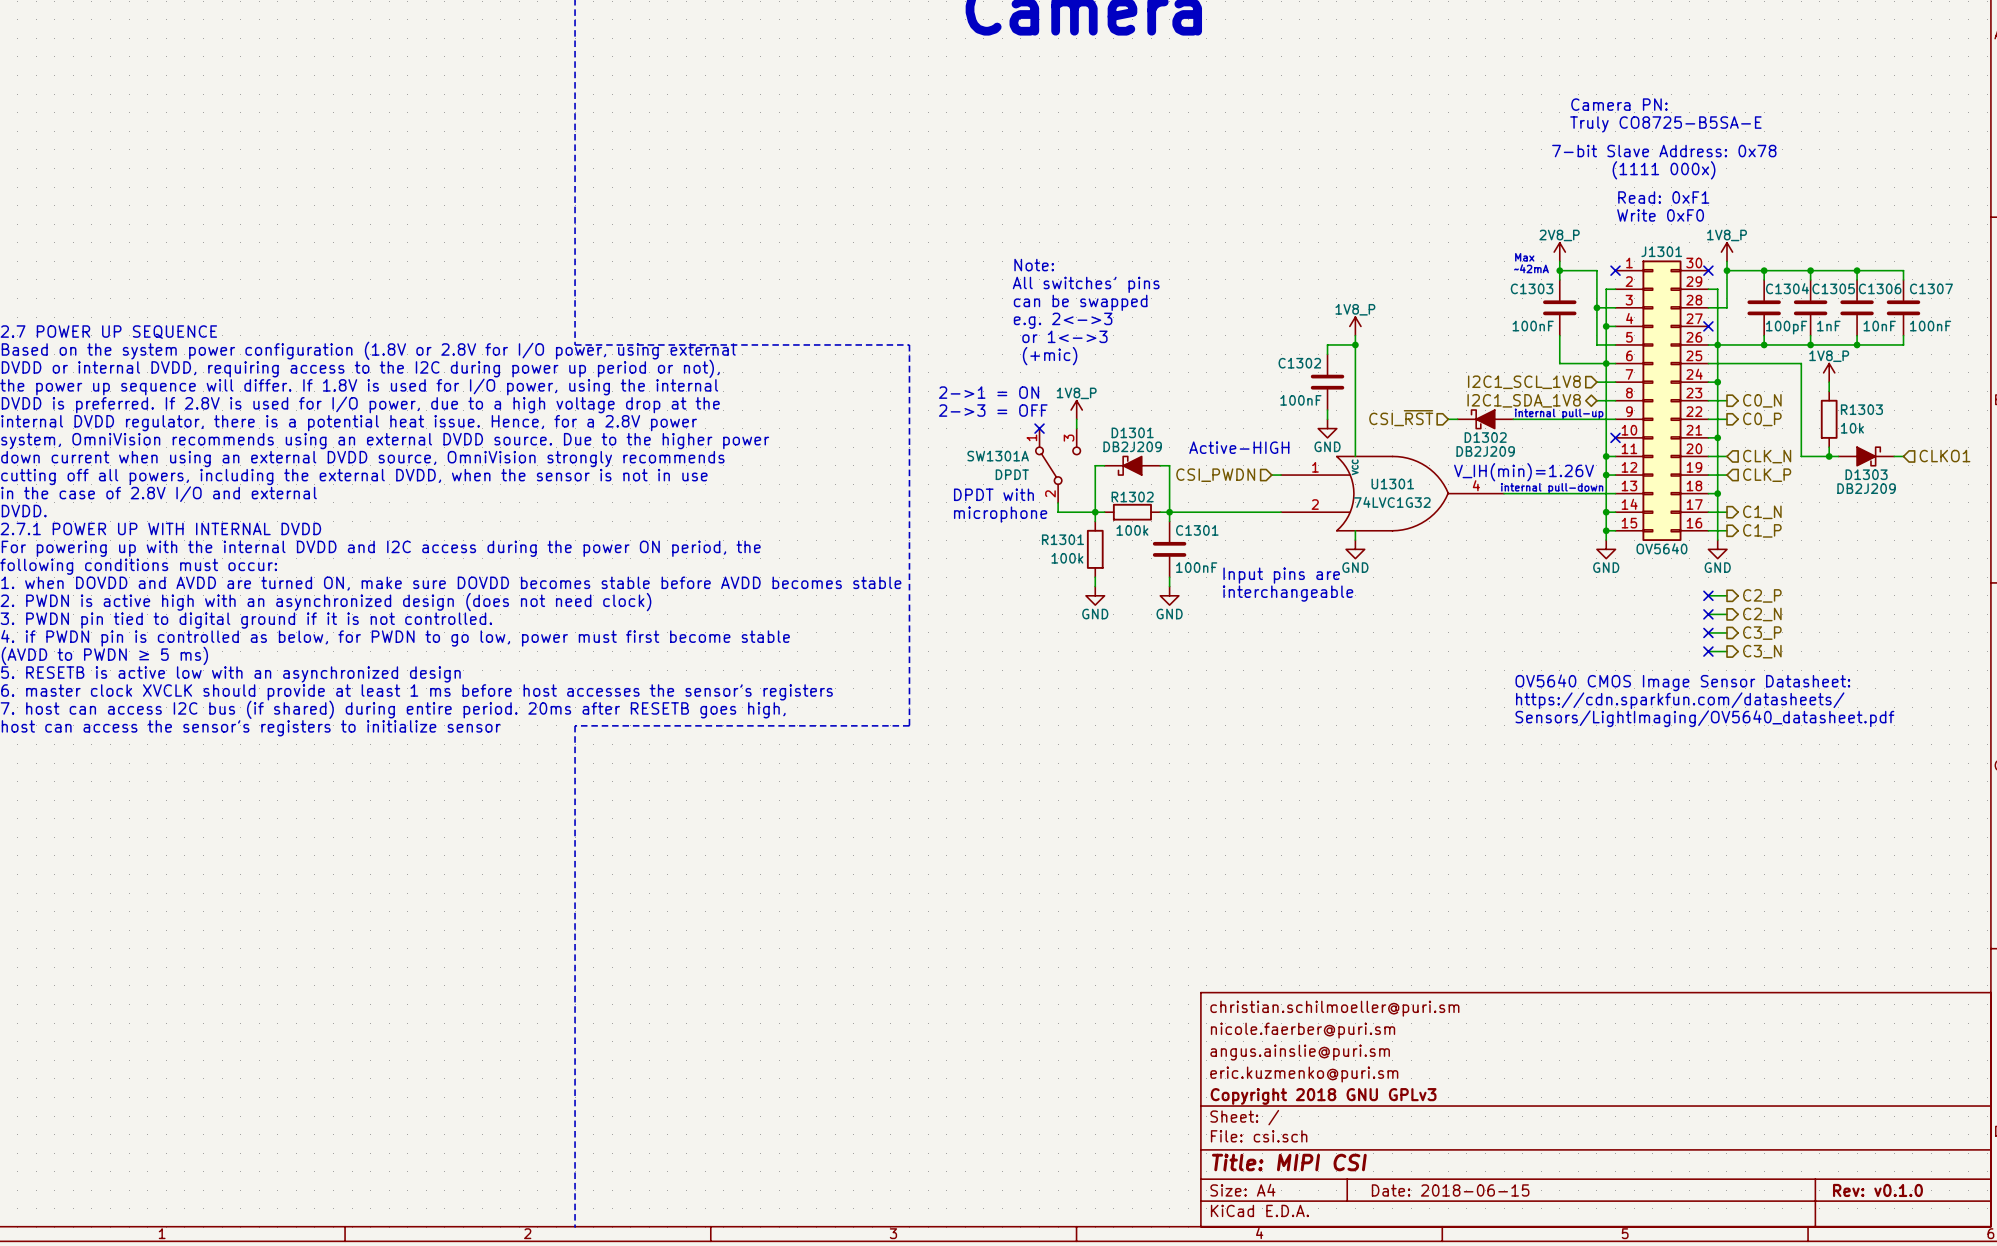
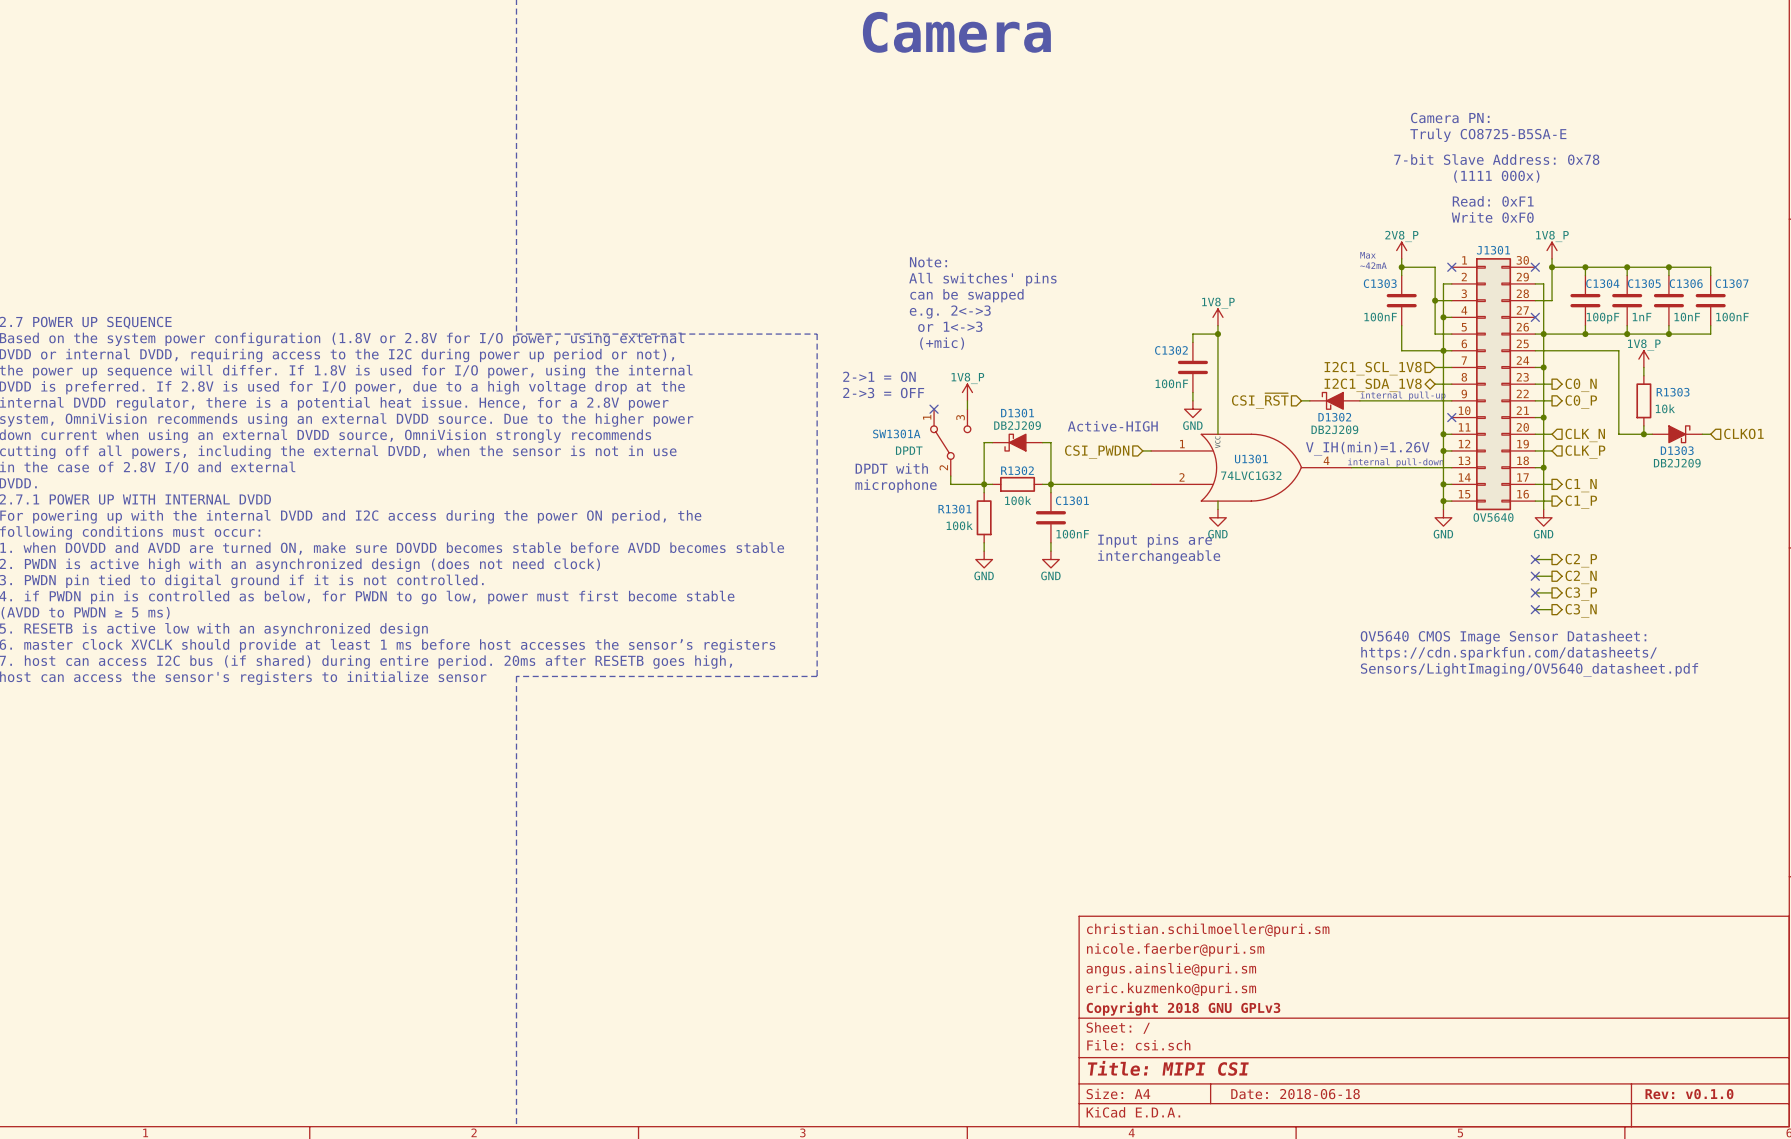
title block: Date: 2018-06-15 (1450, 1190) -> Date: 2018-06-18 (1295, 1094)

